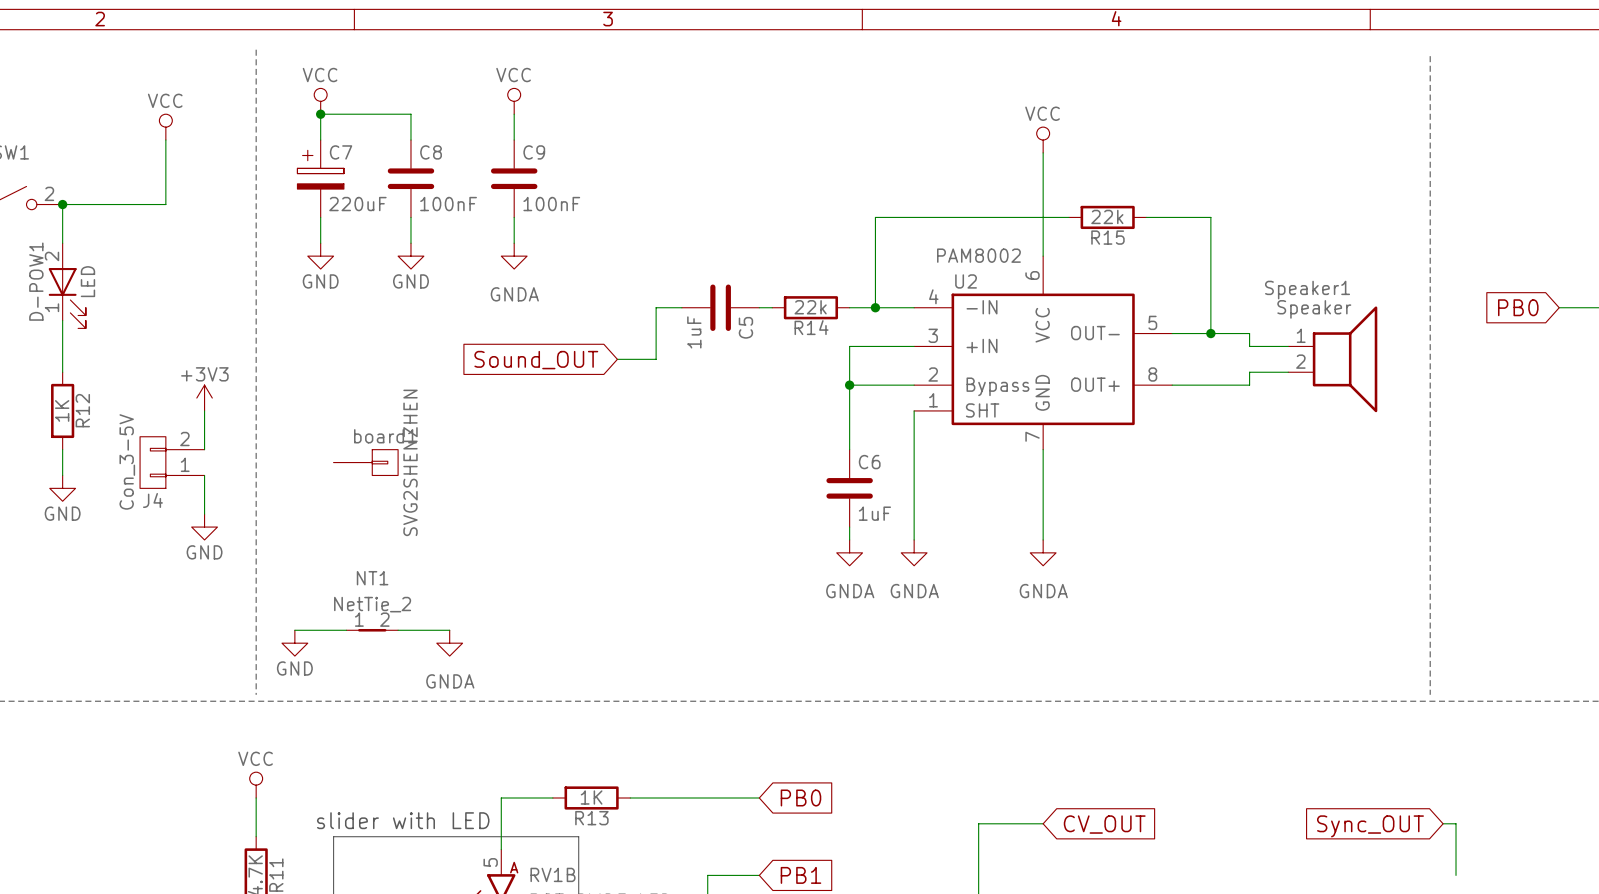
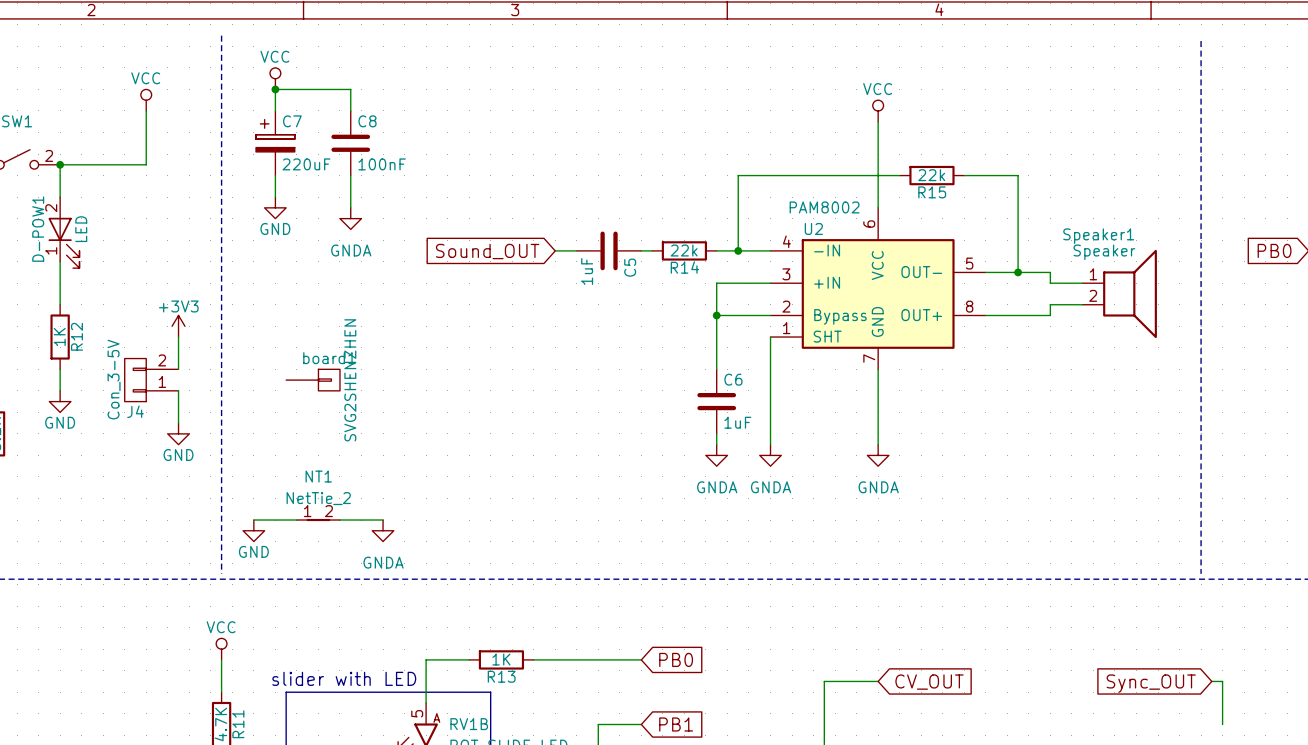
power symbol: VCC (514, 101) -> none
wire: (514, 114) (514, 140) -> none
C9: 100nF (514, 178) -> none
wire: (514, 217) (514, 243) -> none
power symbol: GND (410, 256) -> none
power symbol position: GNDA (514, 256) -> GNDA (350, 218)
wire: (656, 307) (656, 359) (617, 359) -> none
global label position: Sound_OUT (536, 360) -> Sound_OUT (487, 251)

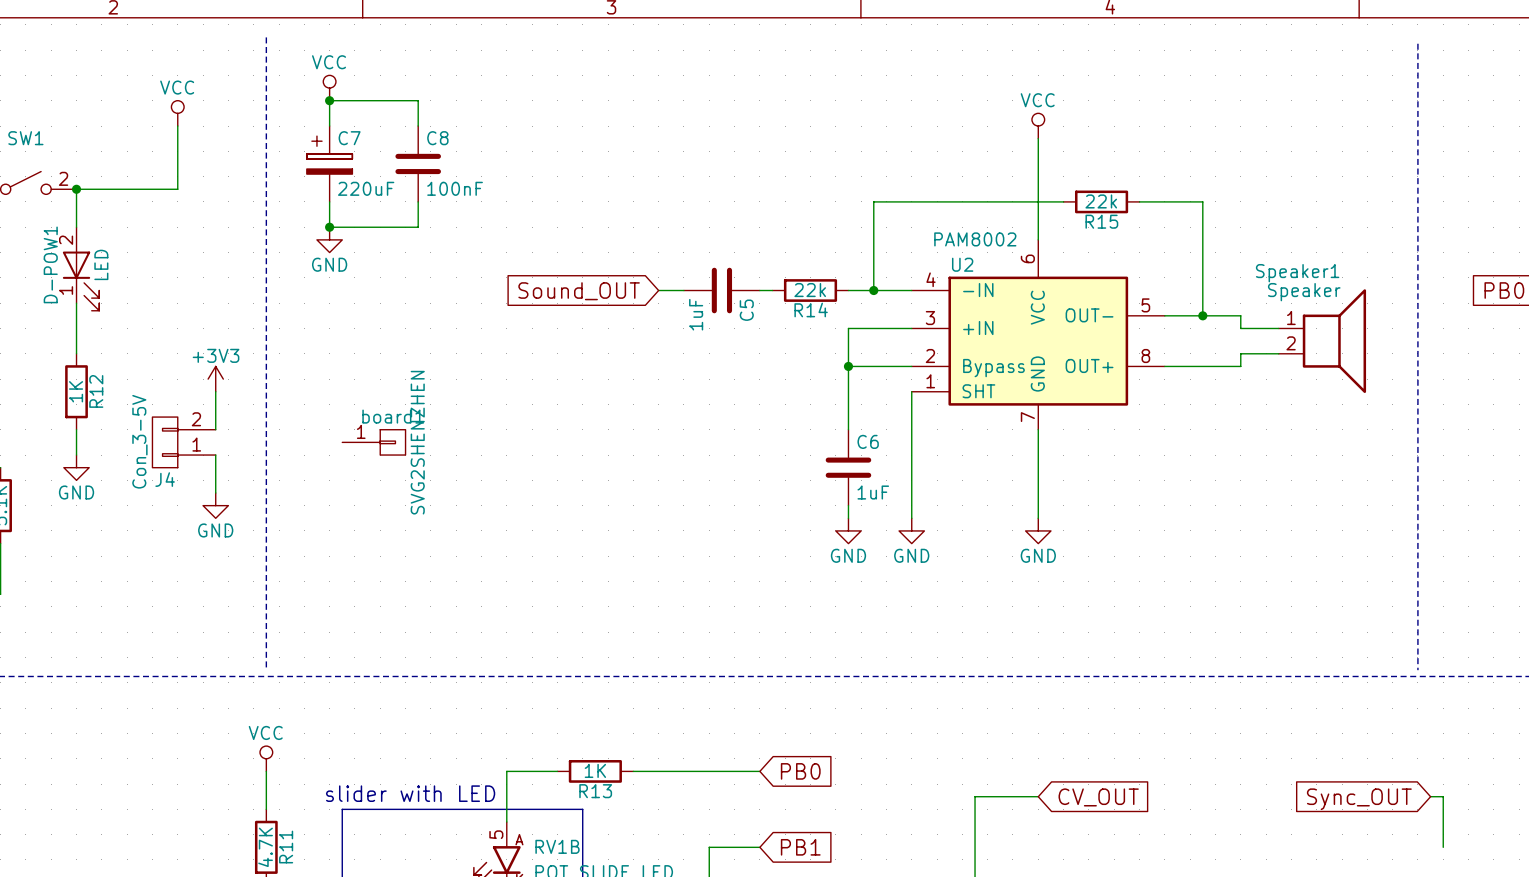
junction: none -> (329, 227)
wire: (350, 197) (350, 207) -> (418, 227) (329, 227)
power symbol: GNDA (350, 218) -> none
board1 pin number: none -> 1 (361, 431)
power symbol: GNDA (716, 455) -> GND (848, 530)
power symbol: GNDA (770, 455) -> GND (911, 530)
power symbol: GNDA (878, 455) -> GND (1038, 530)
wire: (253, 520) (296, 520) -> none
NT1: NetTie_2 (318, 520) -> none
wire: (339, 520) (383, 520) -> none
power symbol: GND (253, 530) -> none
power symbol: GNDA (383, 530) -> none

